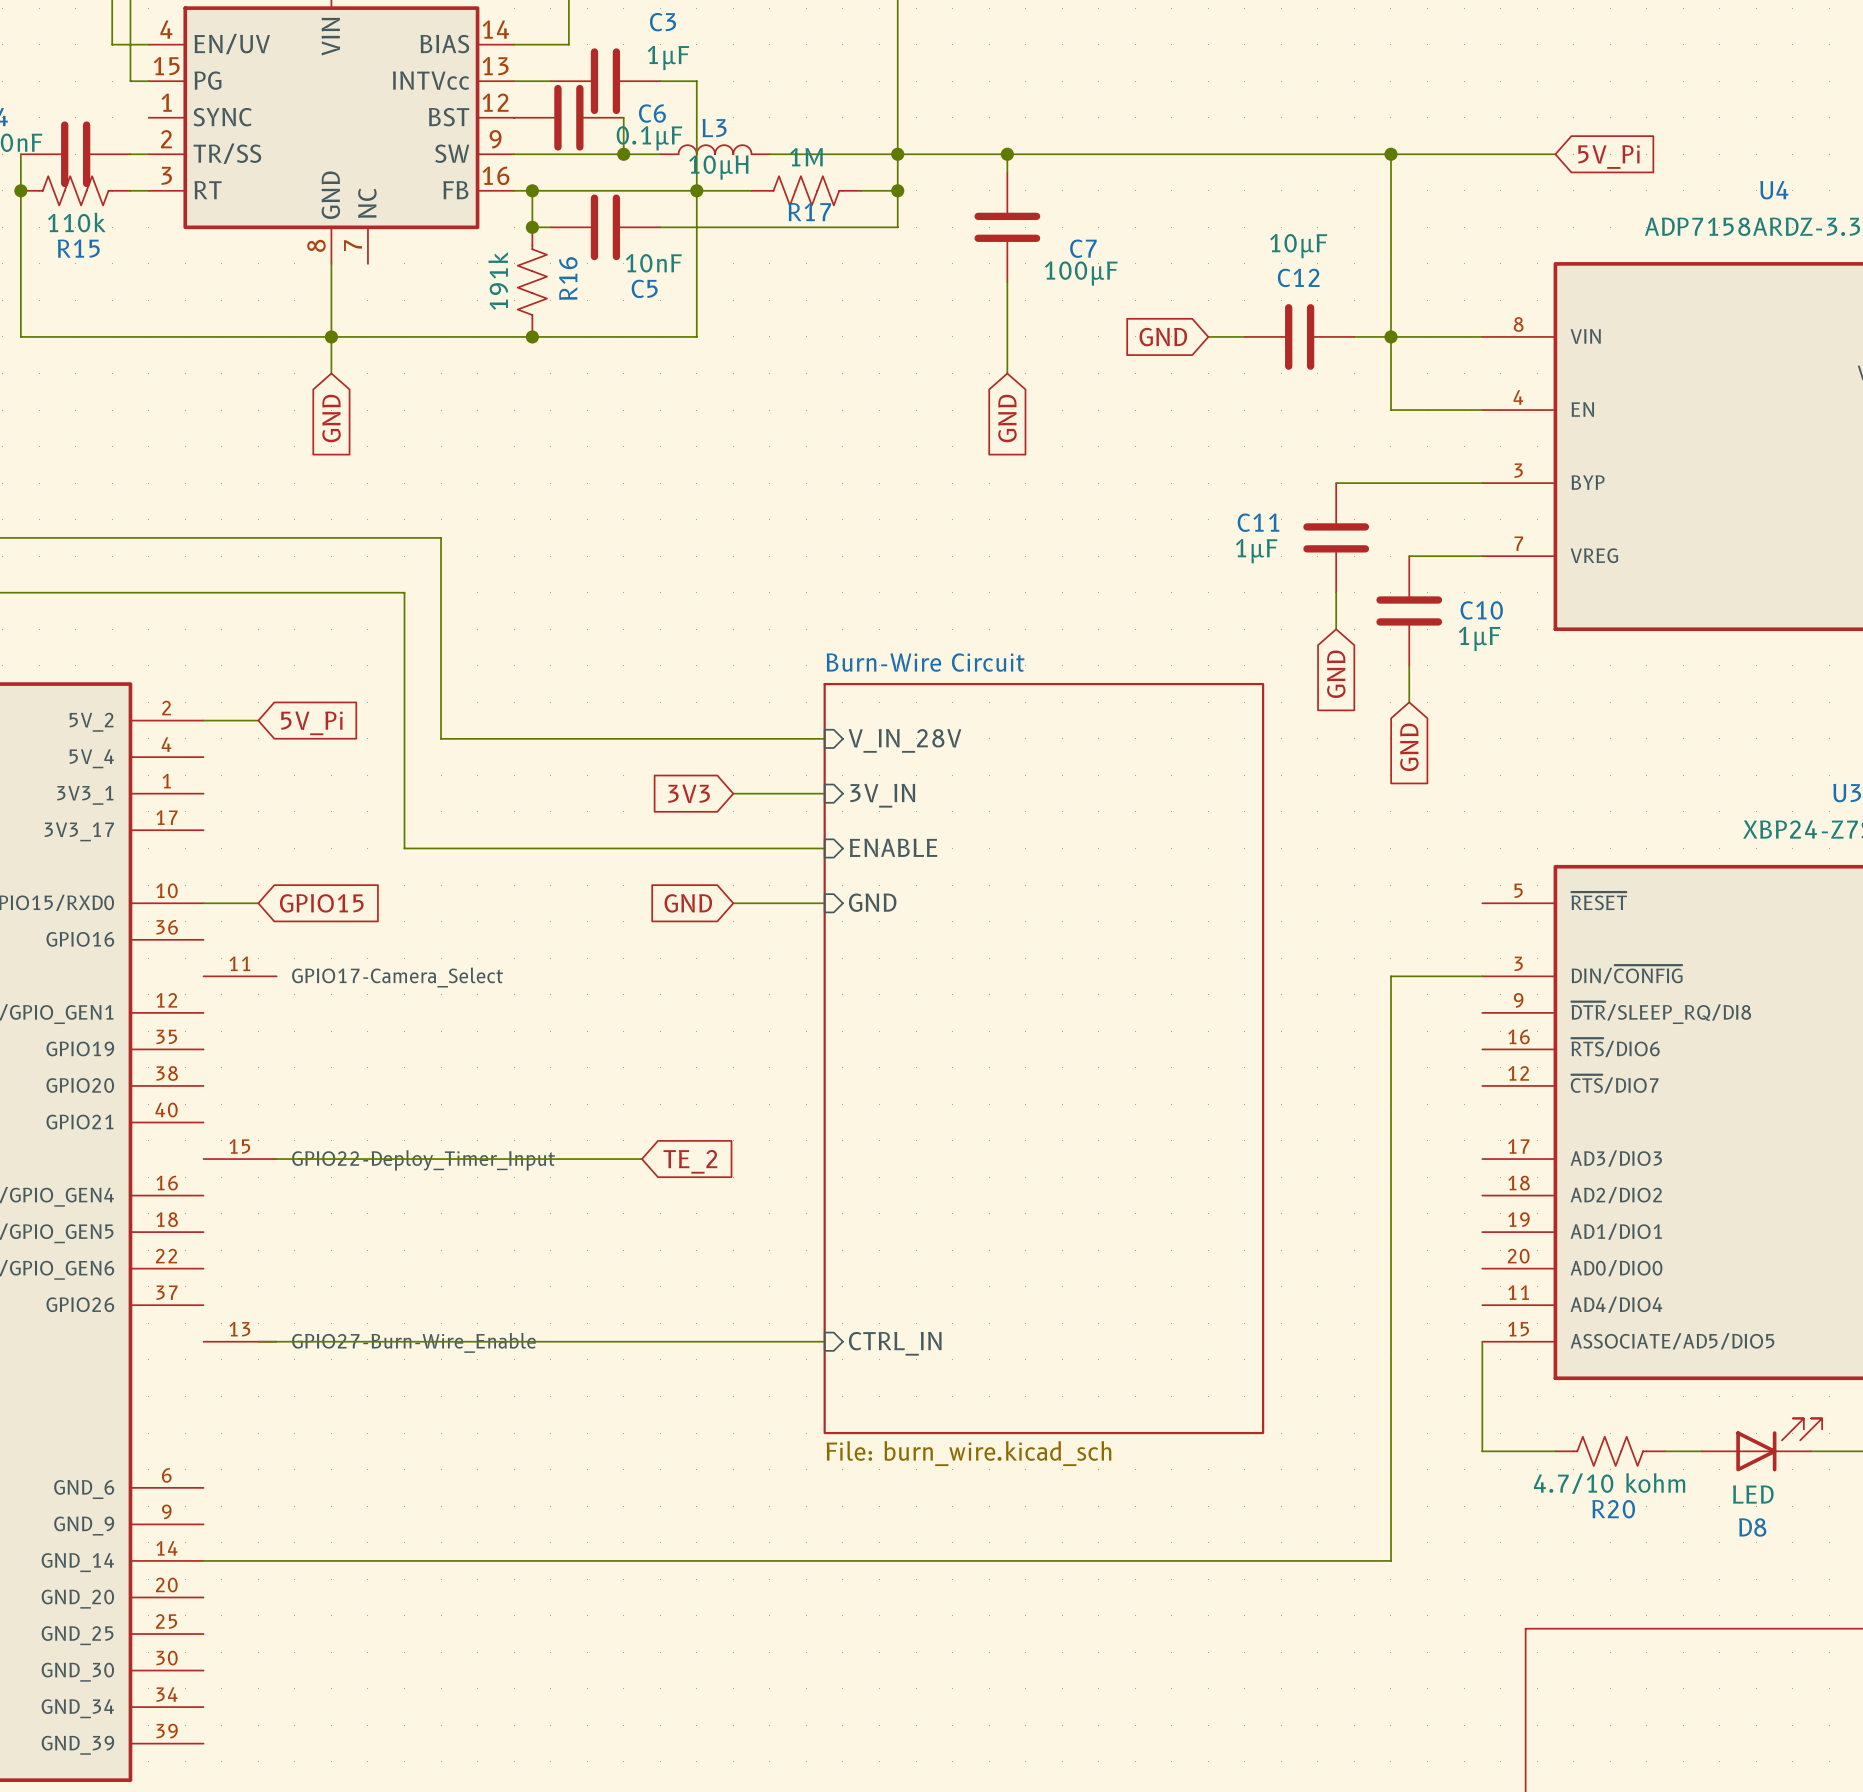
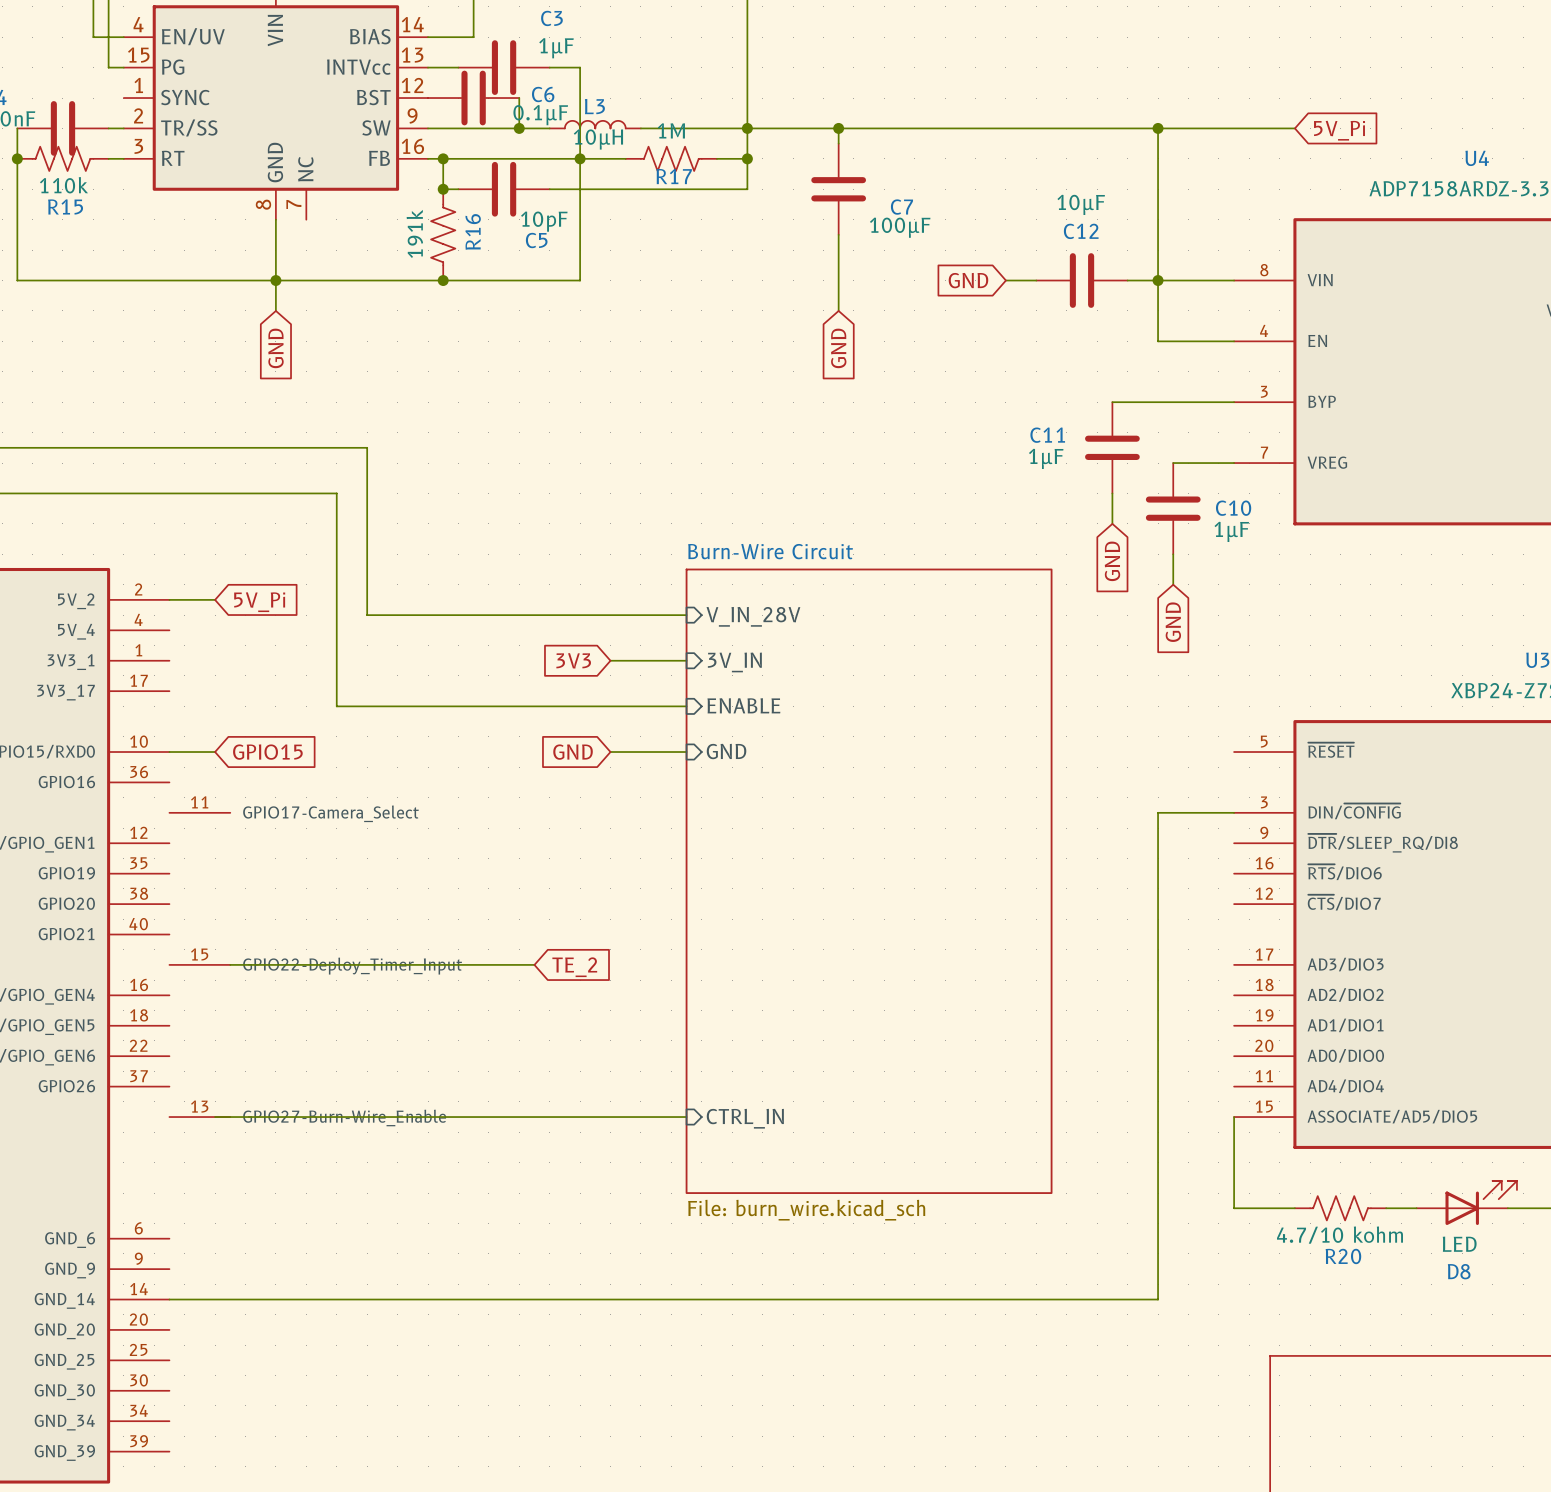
C5 value: 10nF (653, 263) -> 10pF (544, 221)

